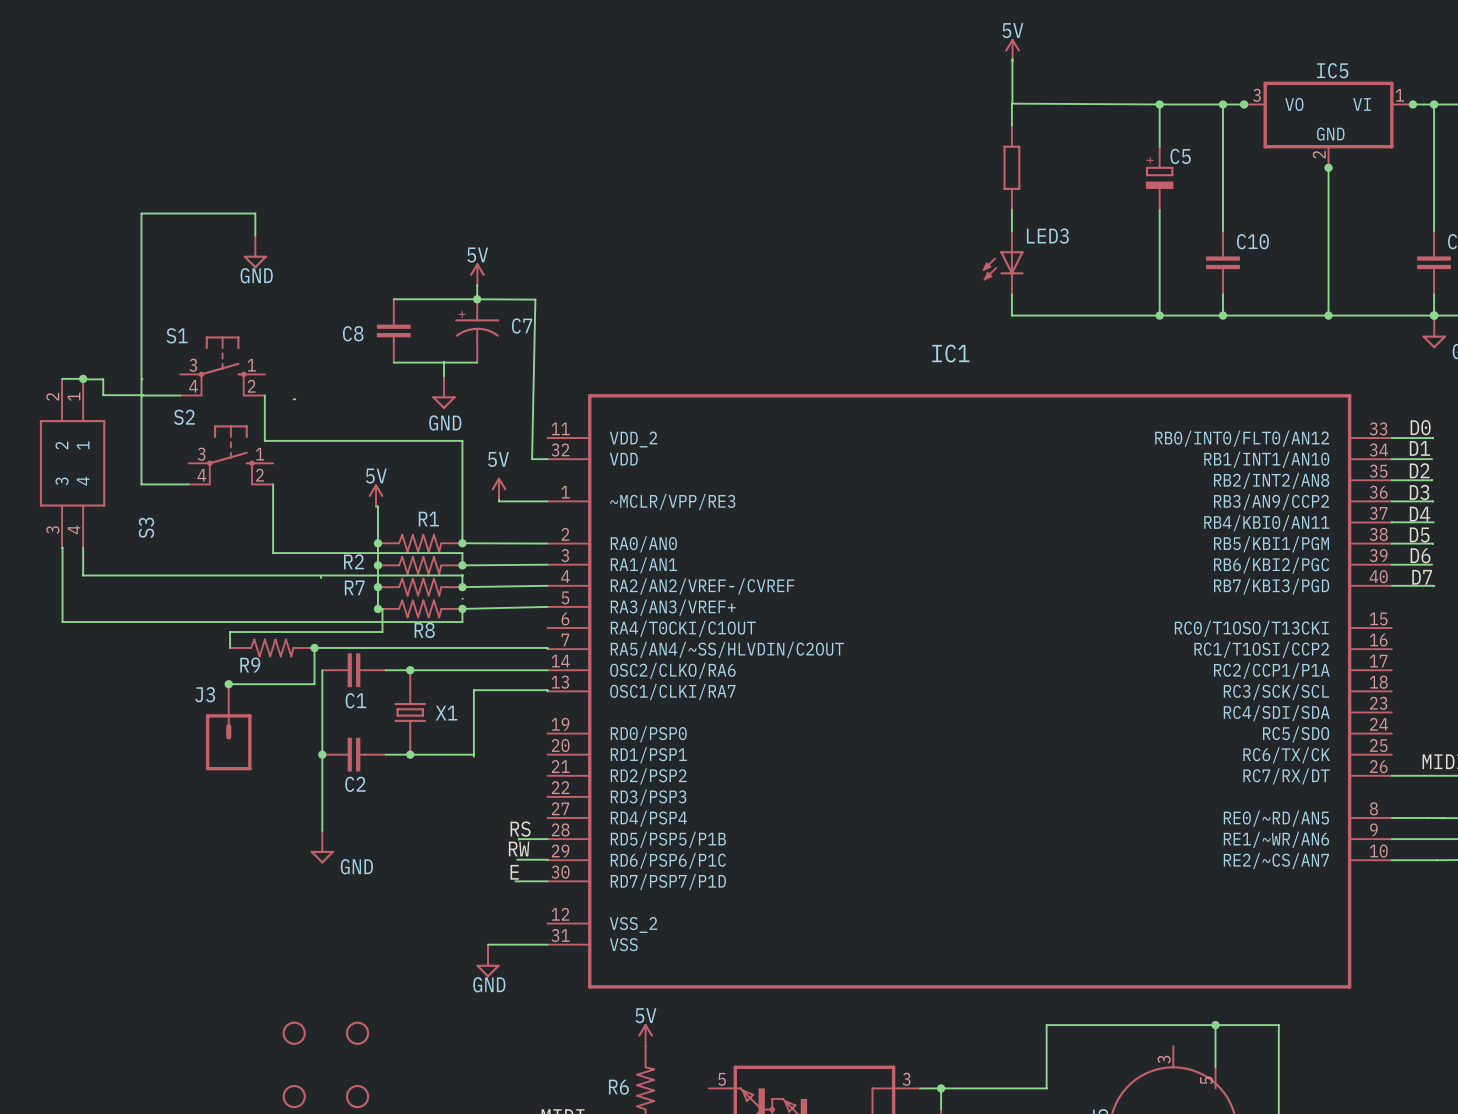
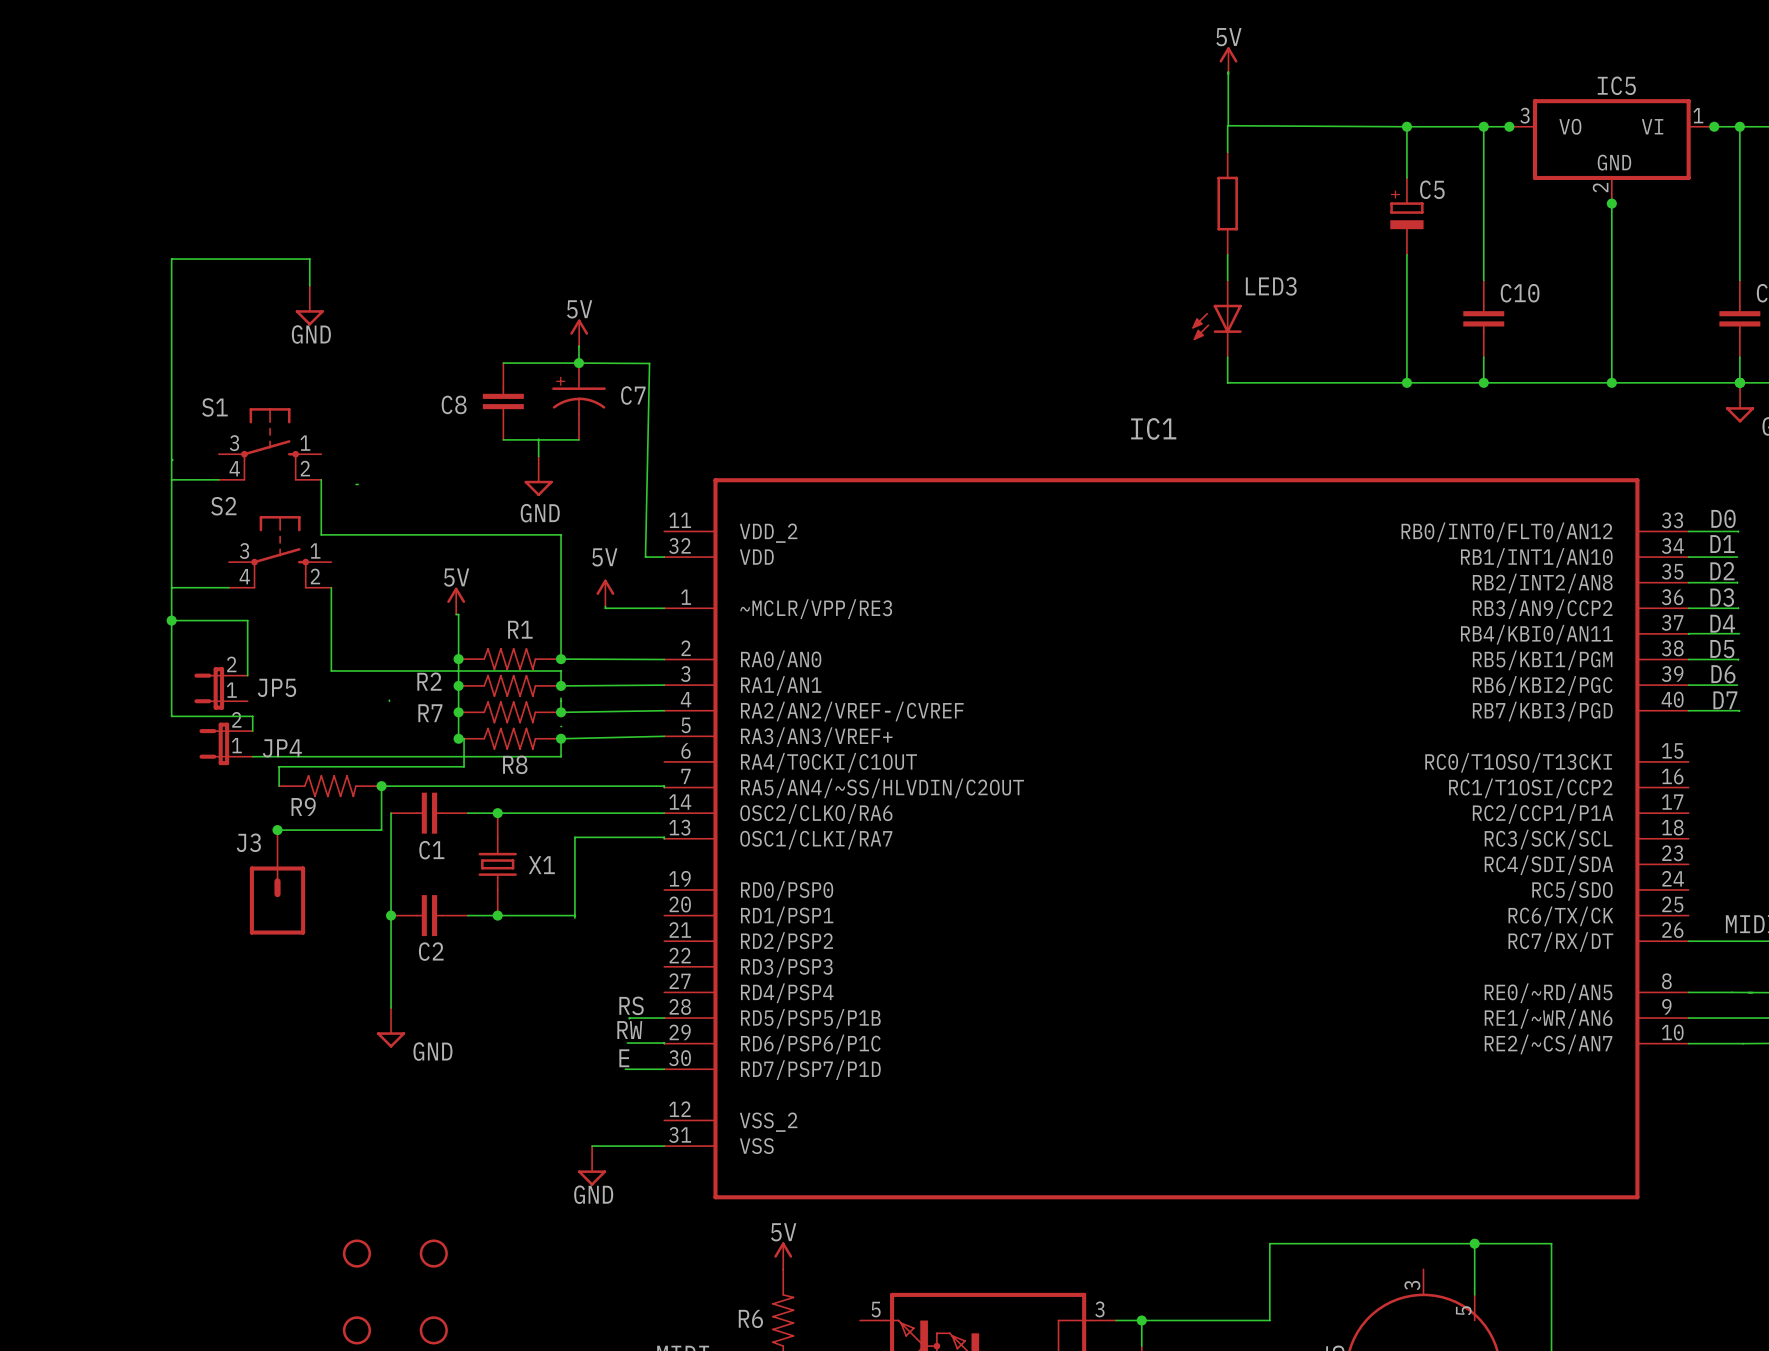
wire: (393, 299) (414, 299) -> none
C8 position: (393, 330) -> (503, 401)
wire: (393, 362) (414, 362) -> none
wire: (62, 378) (103, 379) (103, 395) (143, 395) -> none
junction: (83, 378) -> none
S3: (72, 463) -> none
wire: none -> (171, 587) (171, 716) (252, 716) (252, 731)
wire: none -> (171, 620) (247, 620) (247, 675)
junction: none -> (171, 620)
wire: (62, 547) (62, 622) (462, 622) -> (252, 756) (561, 756) (561, 754)
wire: (83, 547) (83, 575) (463, 575) -> none
JP5: none -> (221, 688)
JP4: none -> (226, 743)

